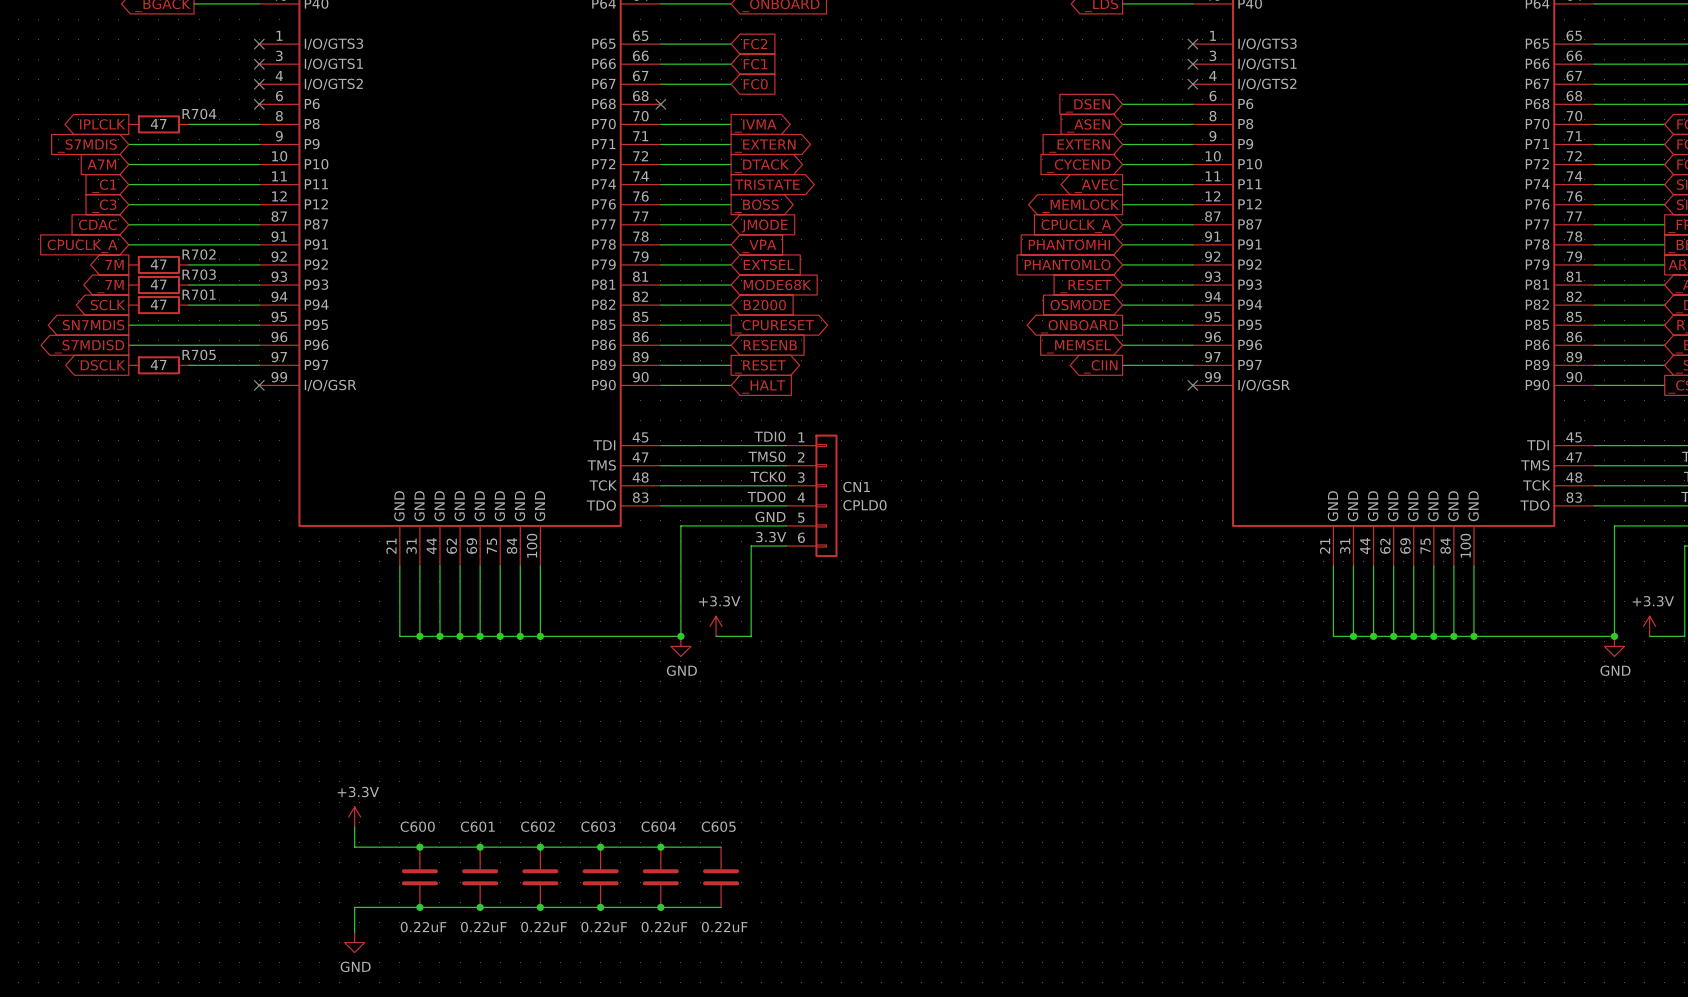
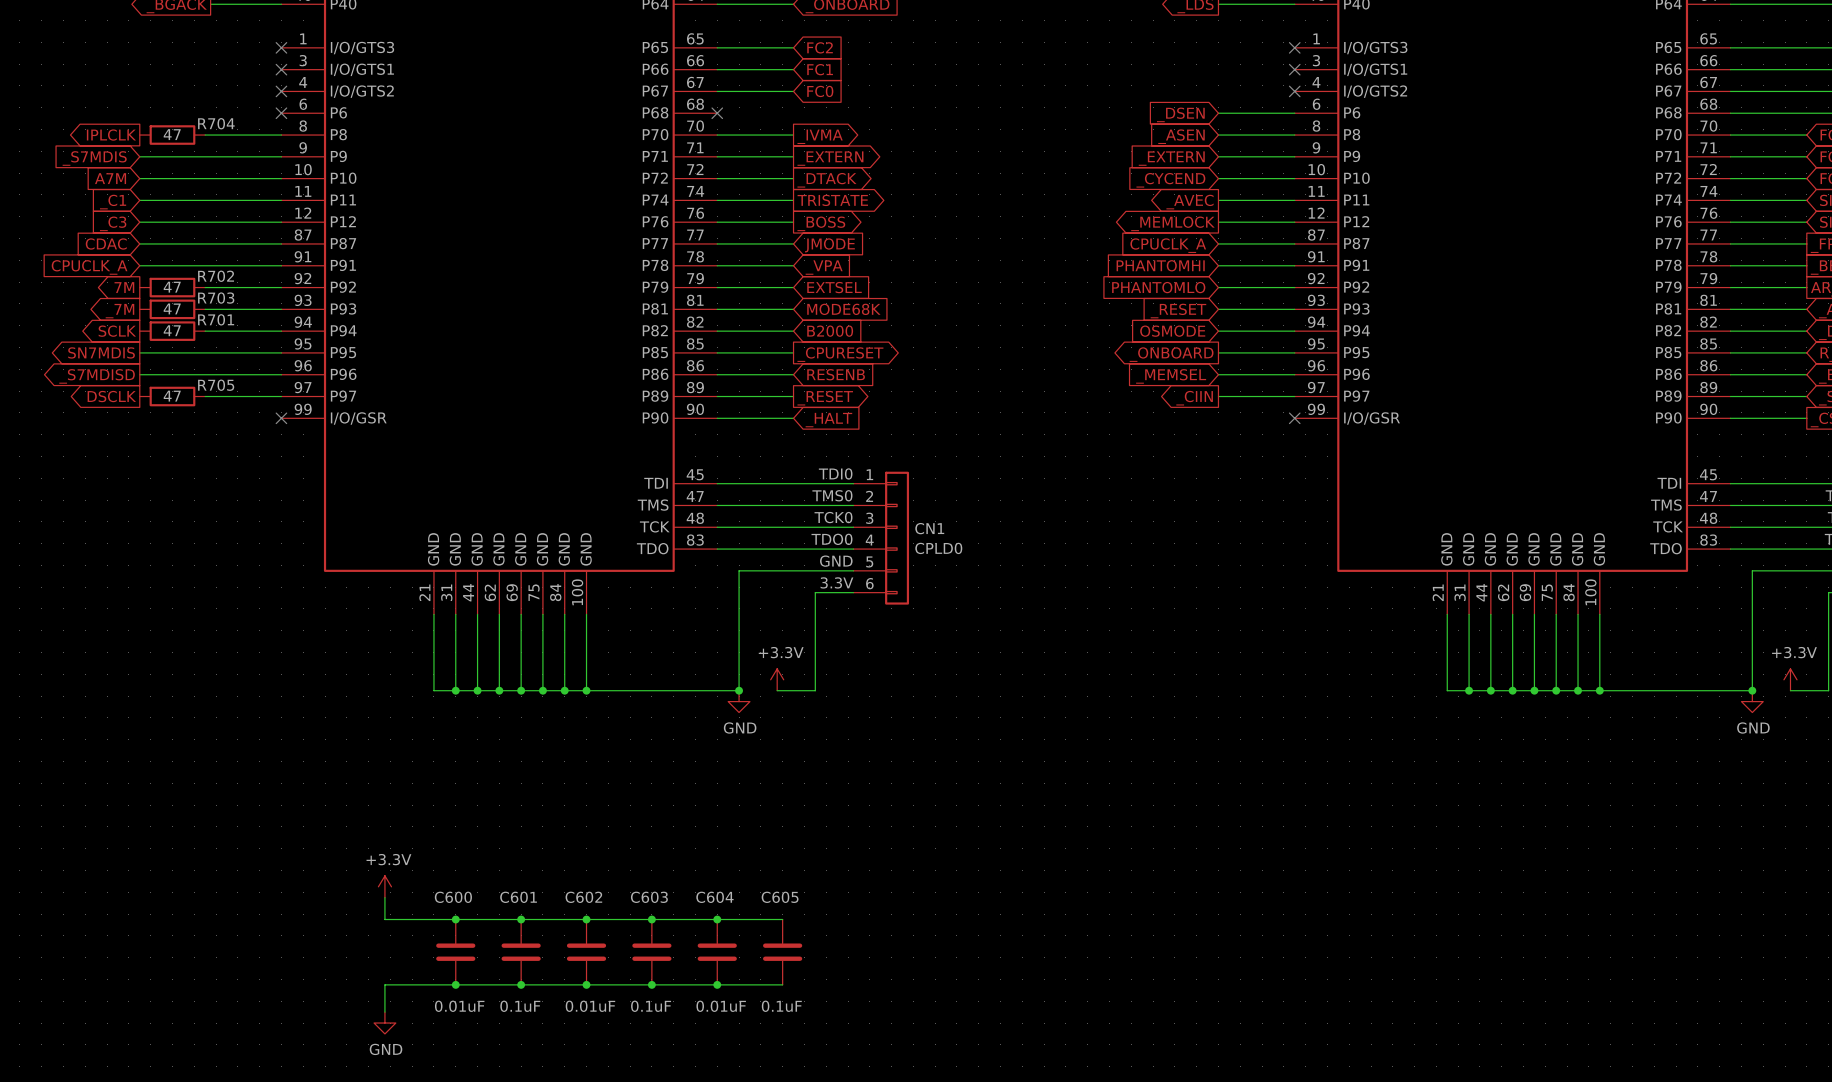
C600 value: 0.22uF (423, 927) -> 0.01uF (459, 1006)
C601 value: 0.22uF (483, 927) -> 0.1uF (520, 1006)
C602 value: 0.22uF (544, 927) -> 0.01uF (590, 1006)
C603 value: 0.22uF (604, 927) -> 0.1uF (651, 1006)
C604 value: 0.22uF (664, 927) -> 0.01uF (721, 1006)
C605 value: 0.22uF (724, 927) -> 0.1uF (781, 1006)

